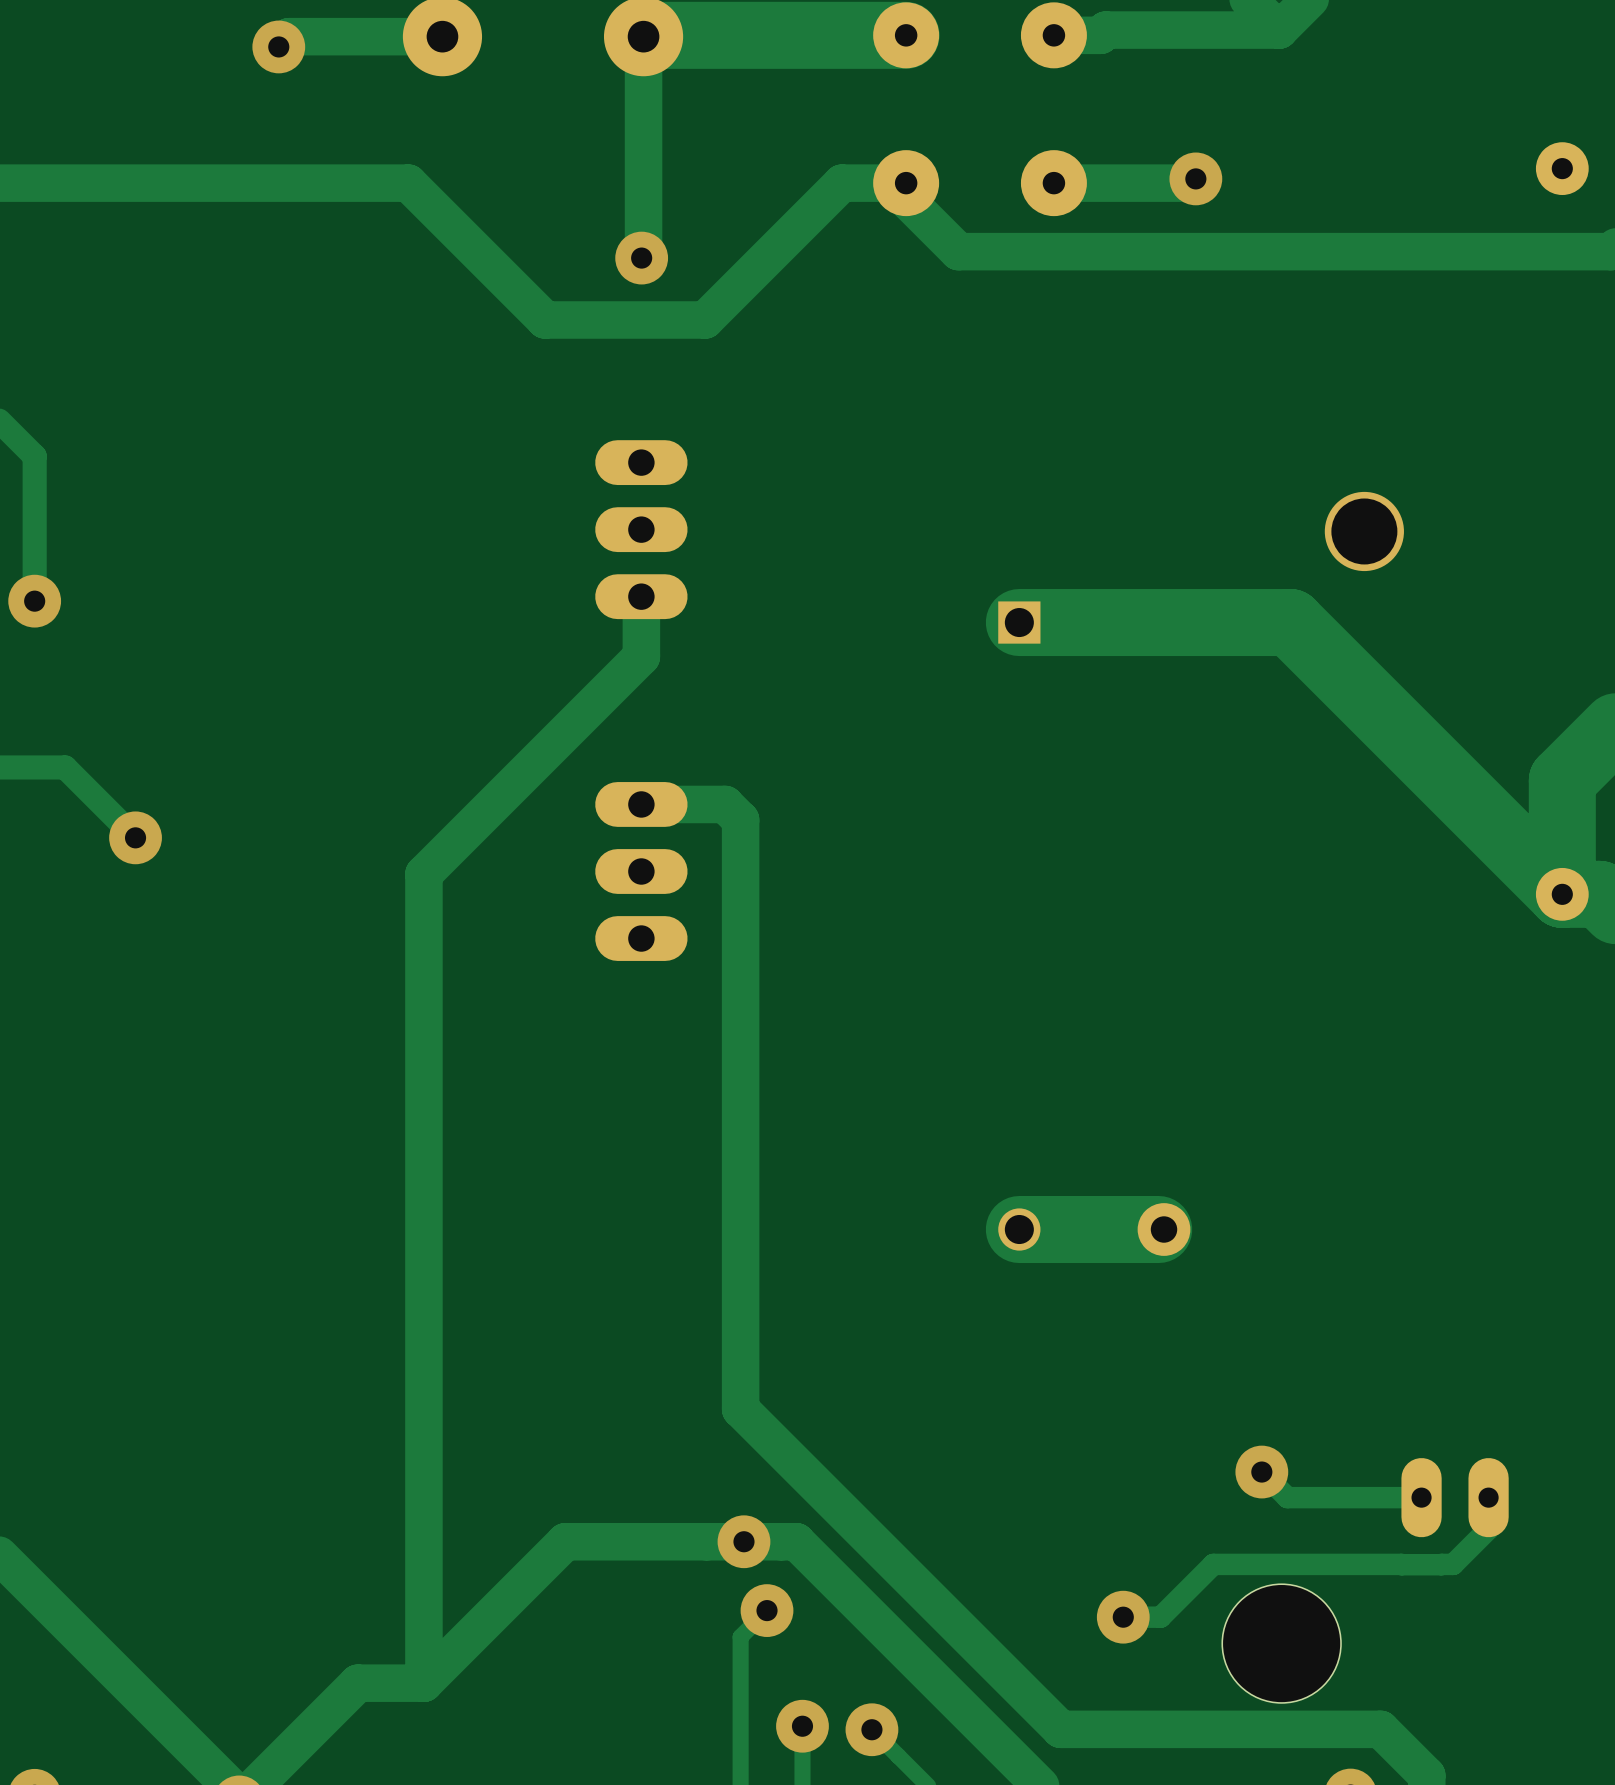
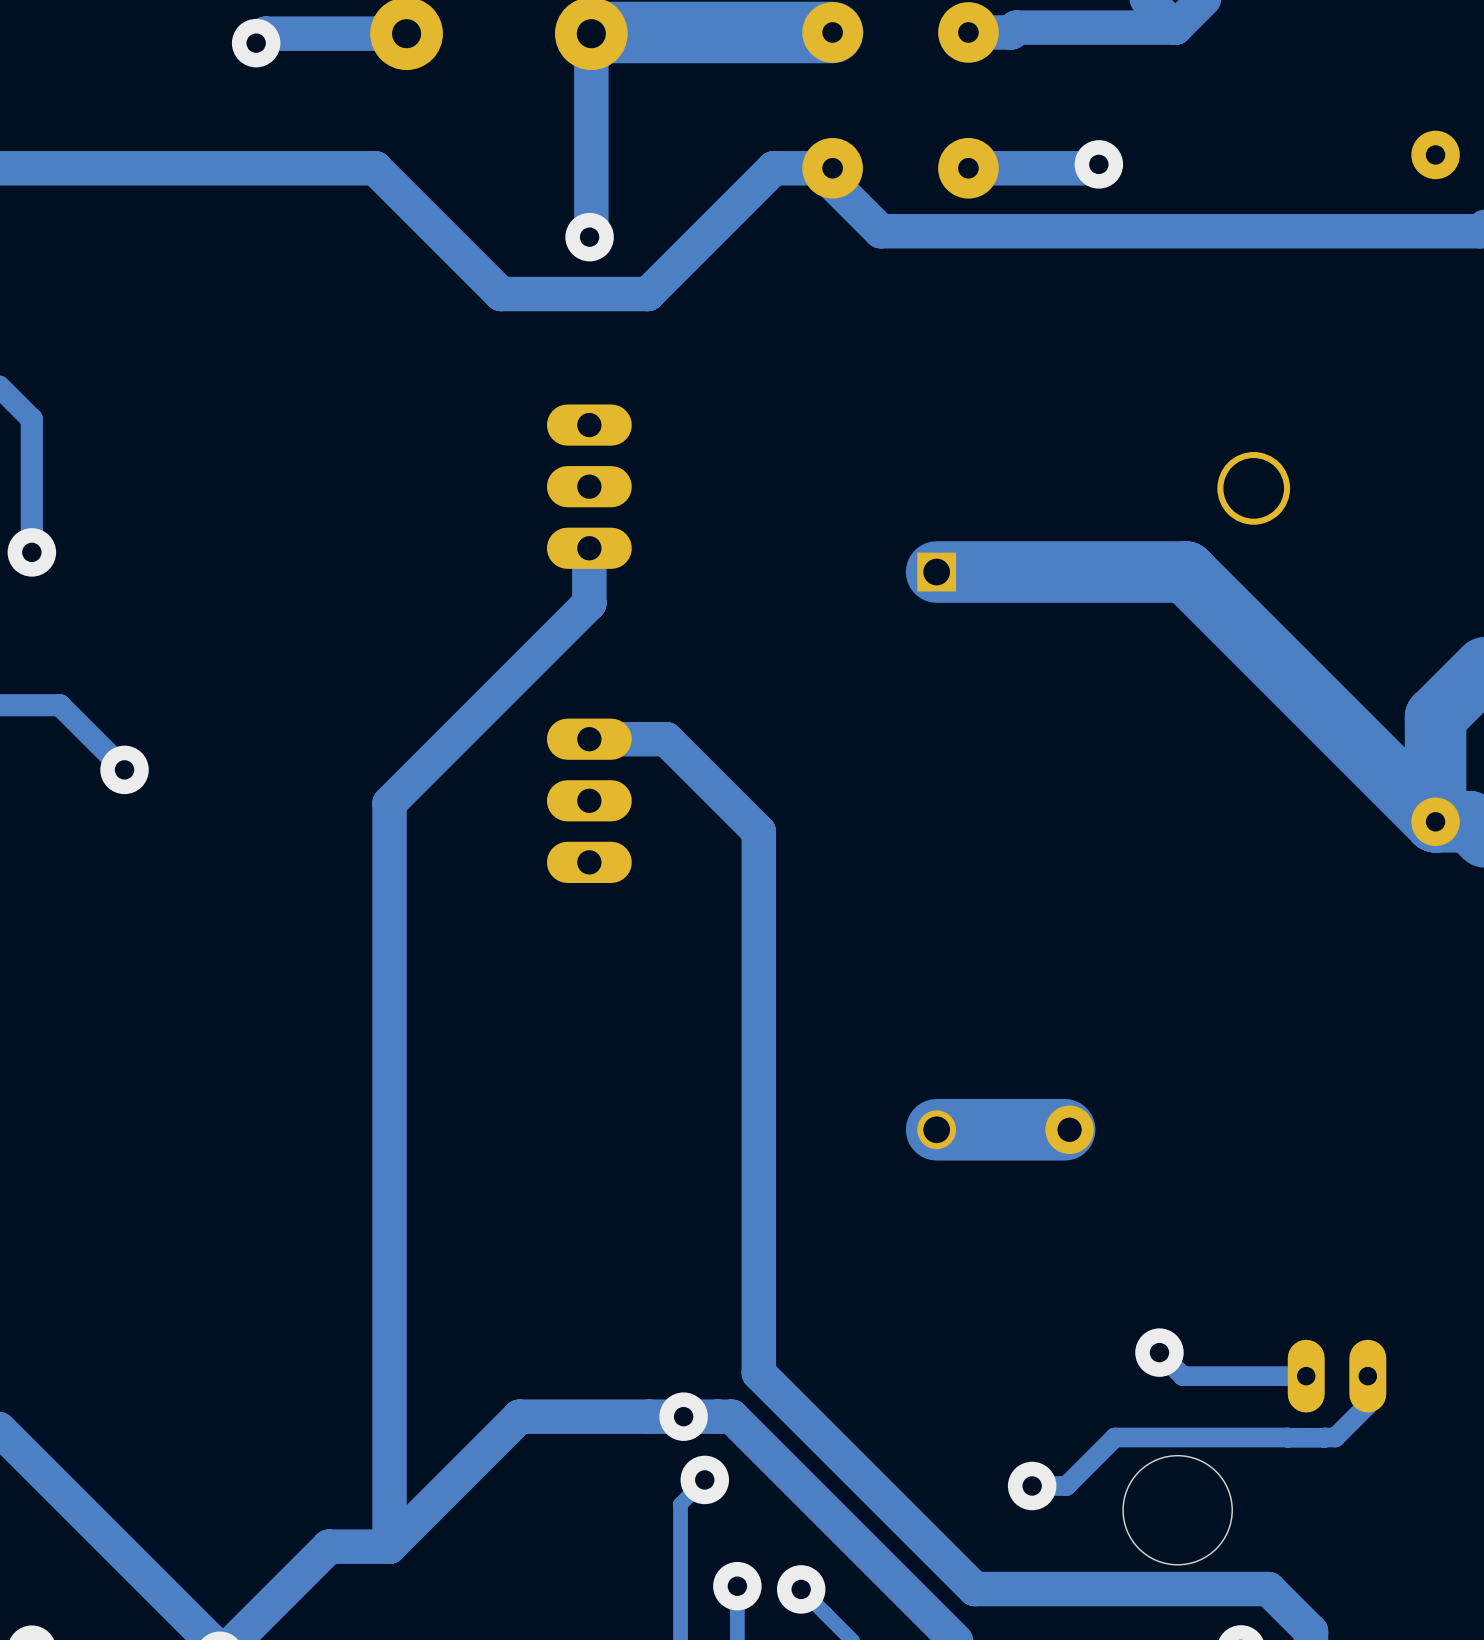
track: (740, 819) (740, 1409) (825, 1494) -> (680, 753) (758, 831) (758, 1373)

